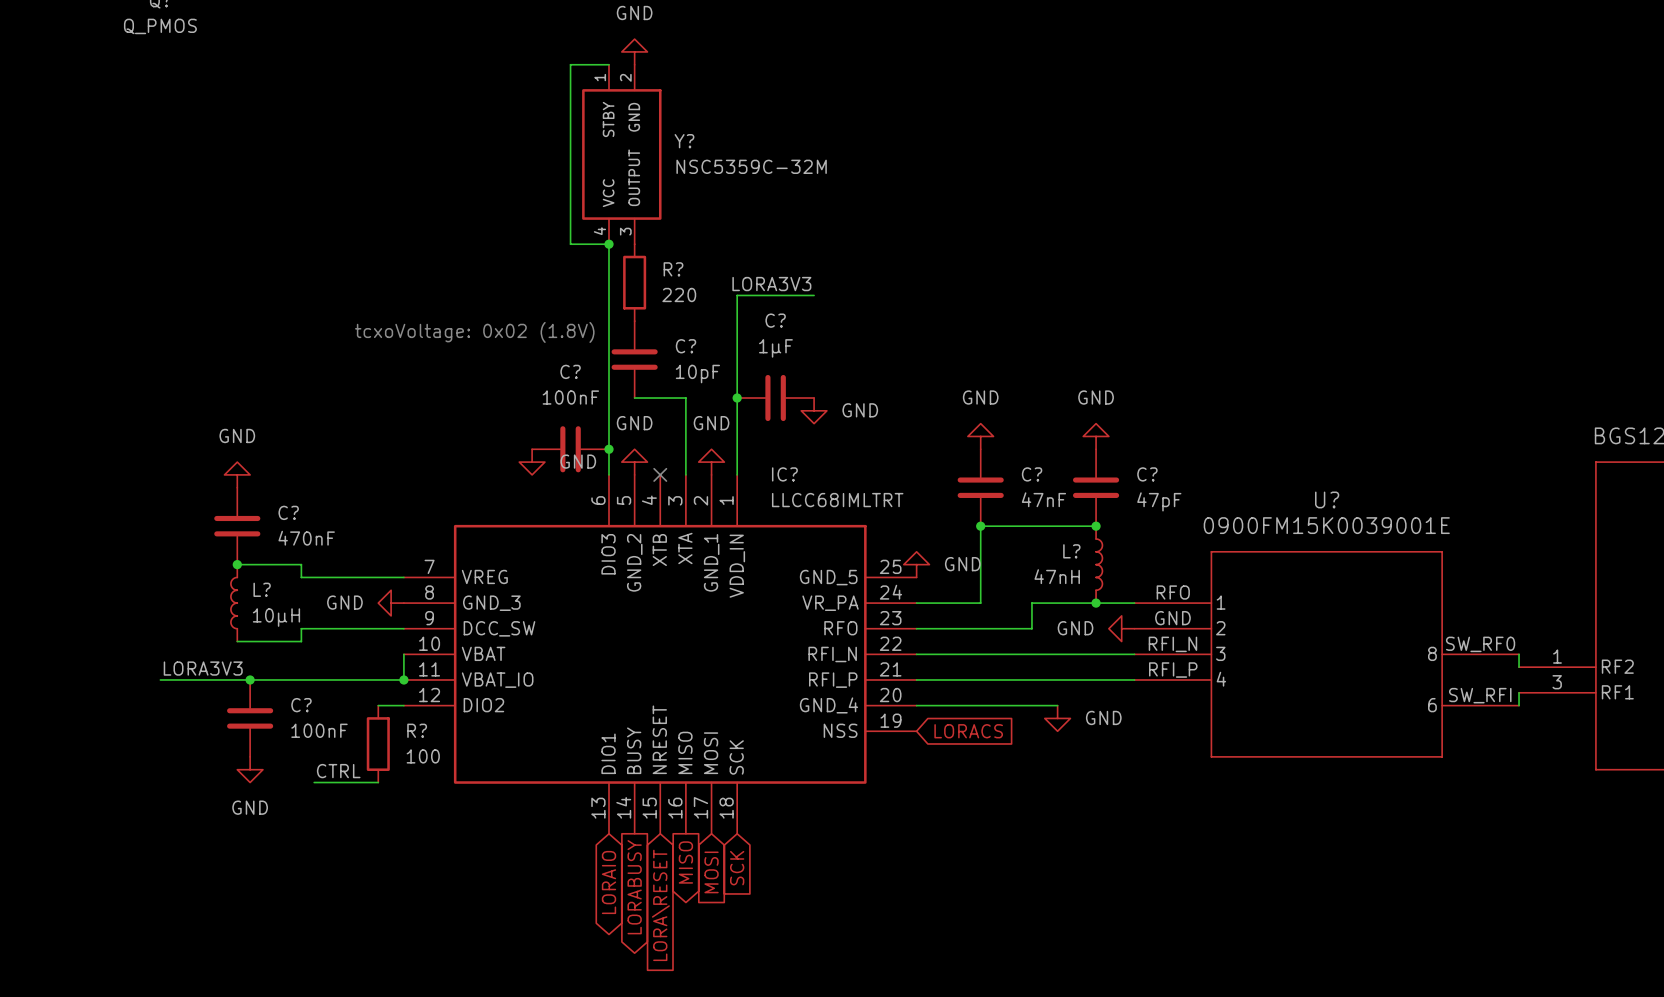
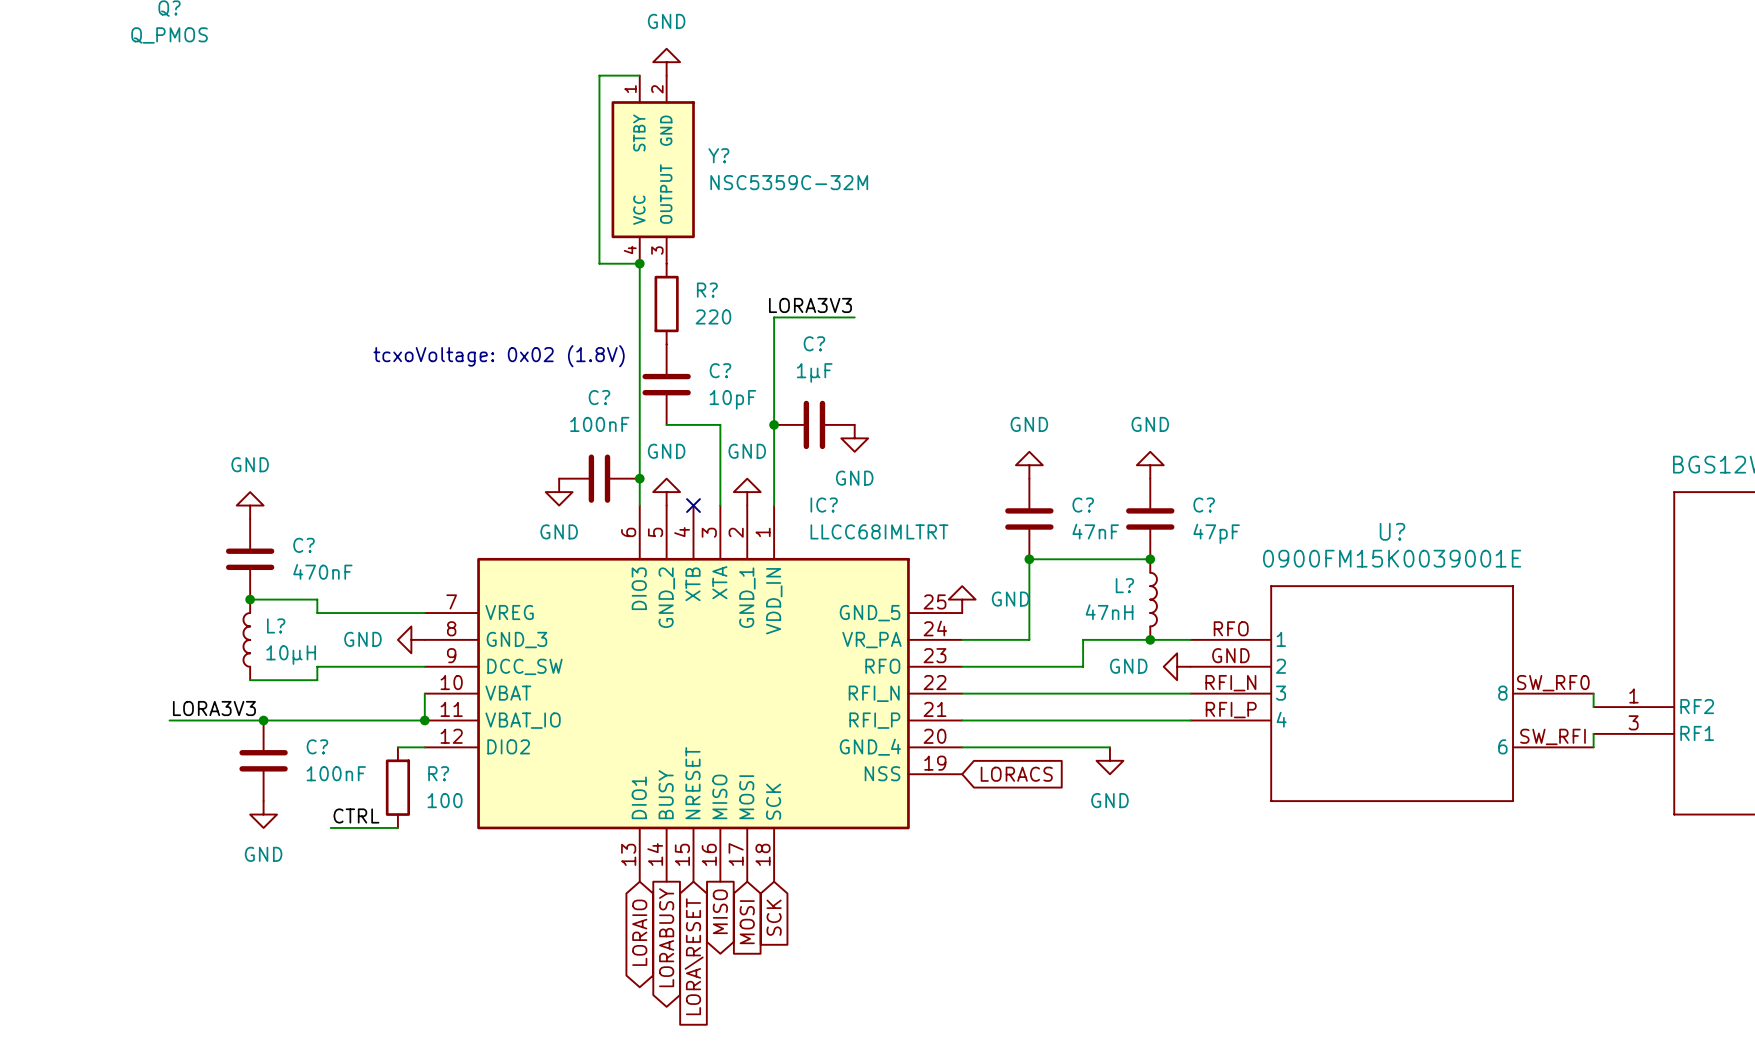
power symbol text position: GND (860, 410) -> GND (854, 478)
power symbol text position: GND (578, 461) -> GND (559, 531)
power symbol text position: GND (1103, 717) -> GND (1109, 800)

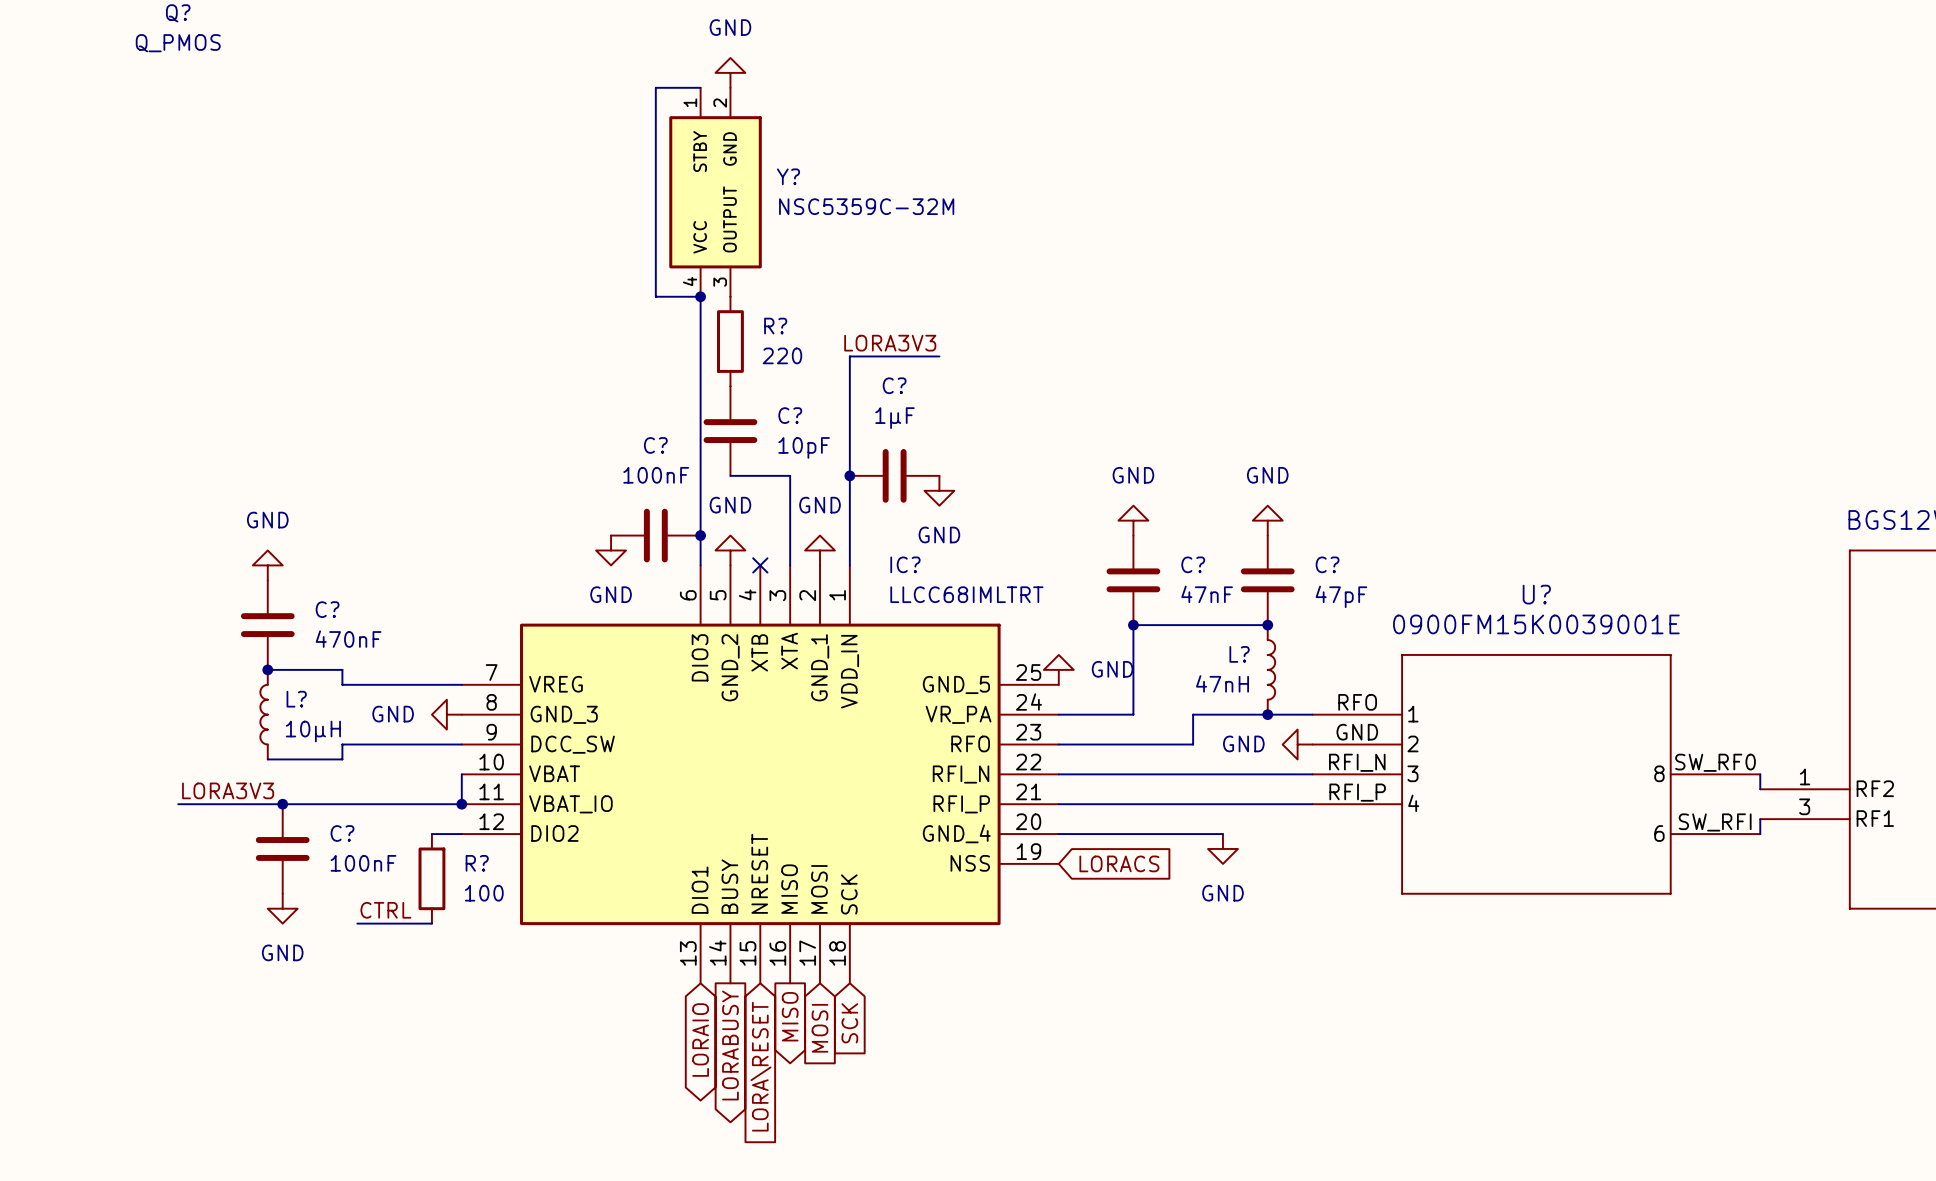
text: tcxoVoltage: 0x02 (1.8V) (499, 356) -> none

